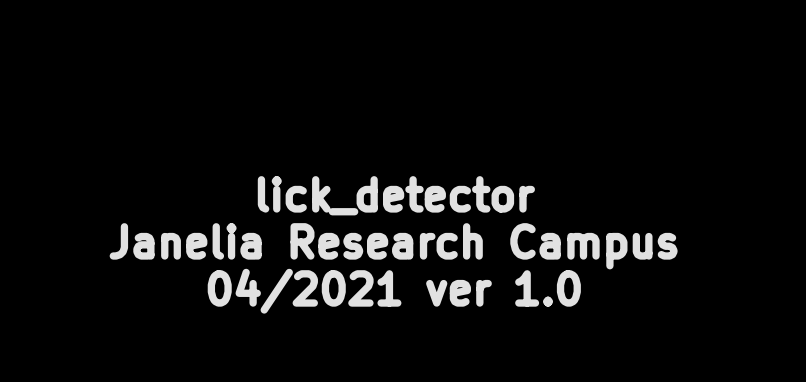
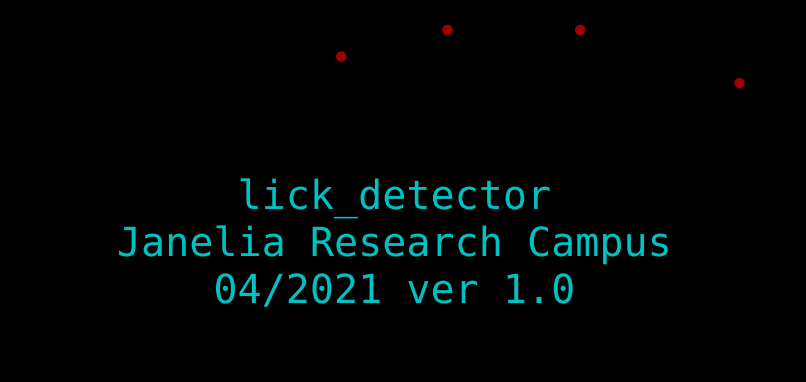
part: none -> (447, 30)
part: none -> (580, 30)
part: none -> (341, 56)
part: none -> (739, 83)

